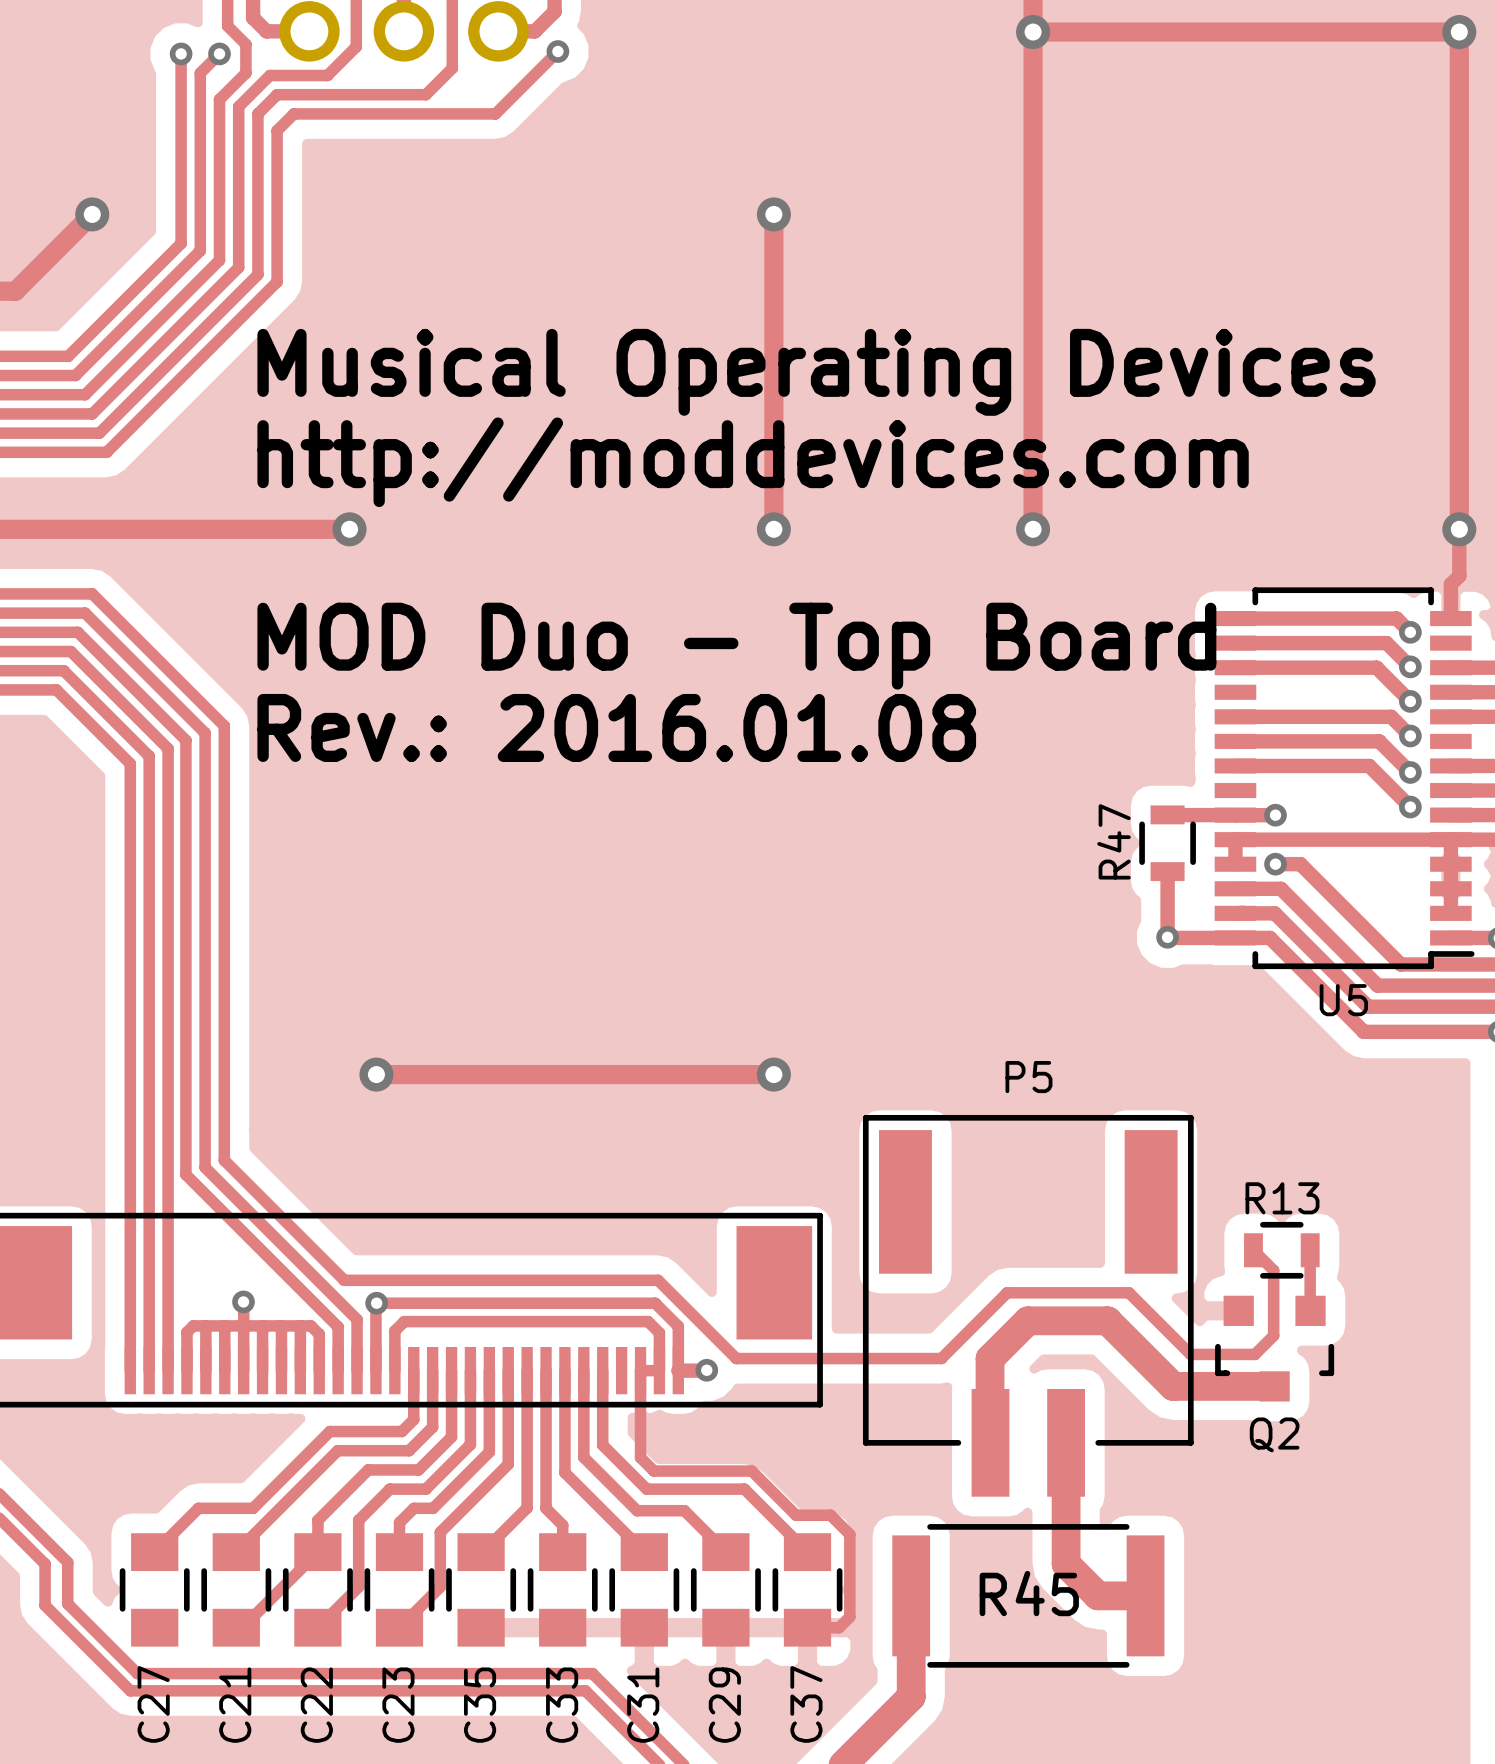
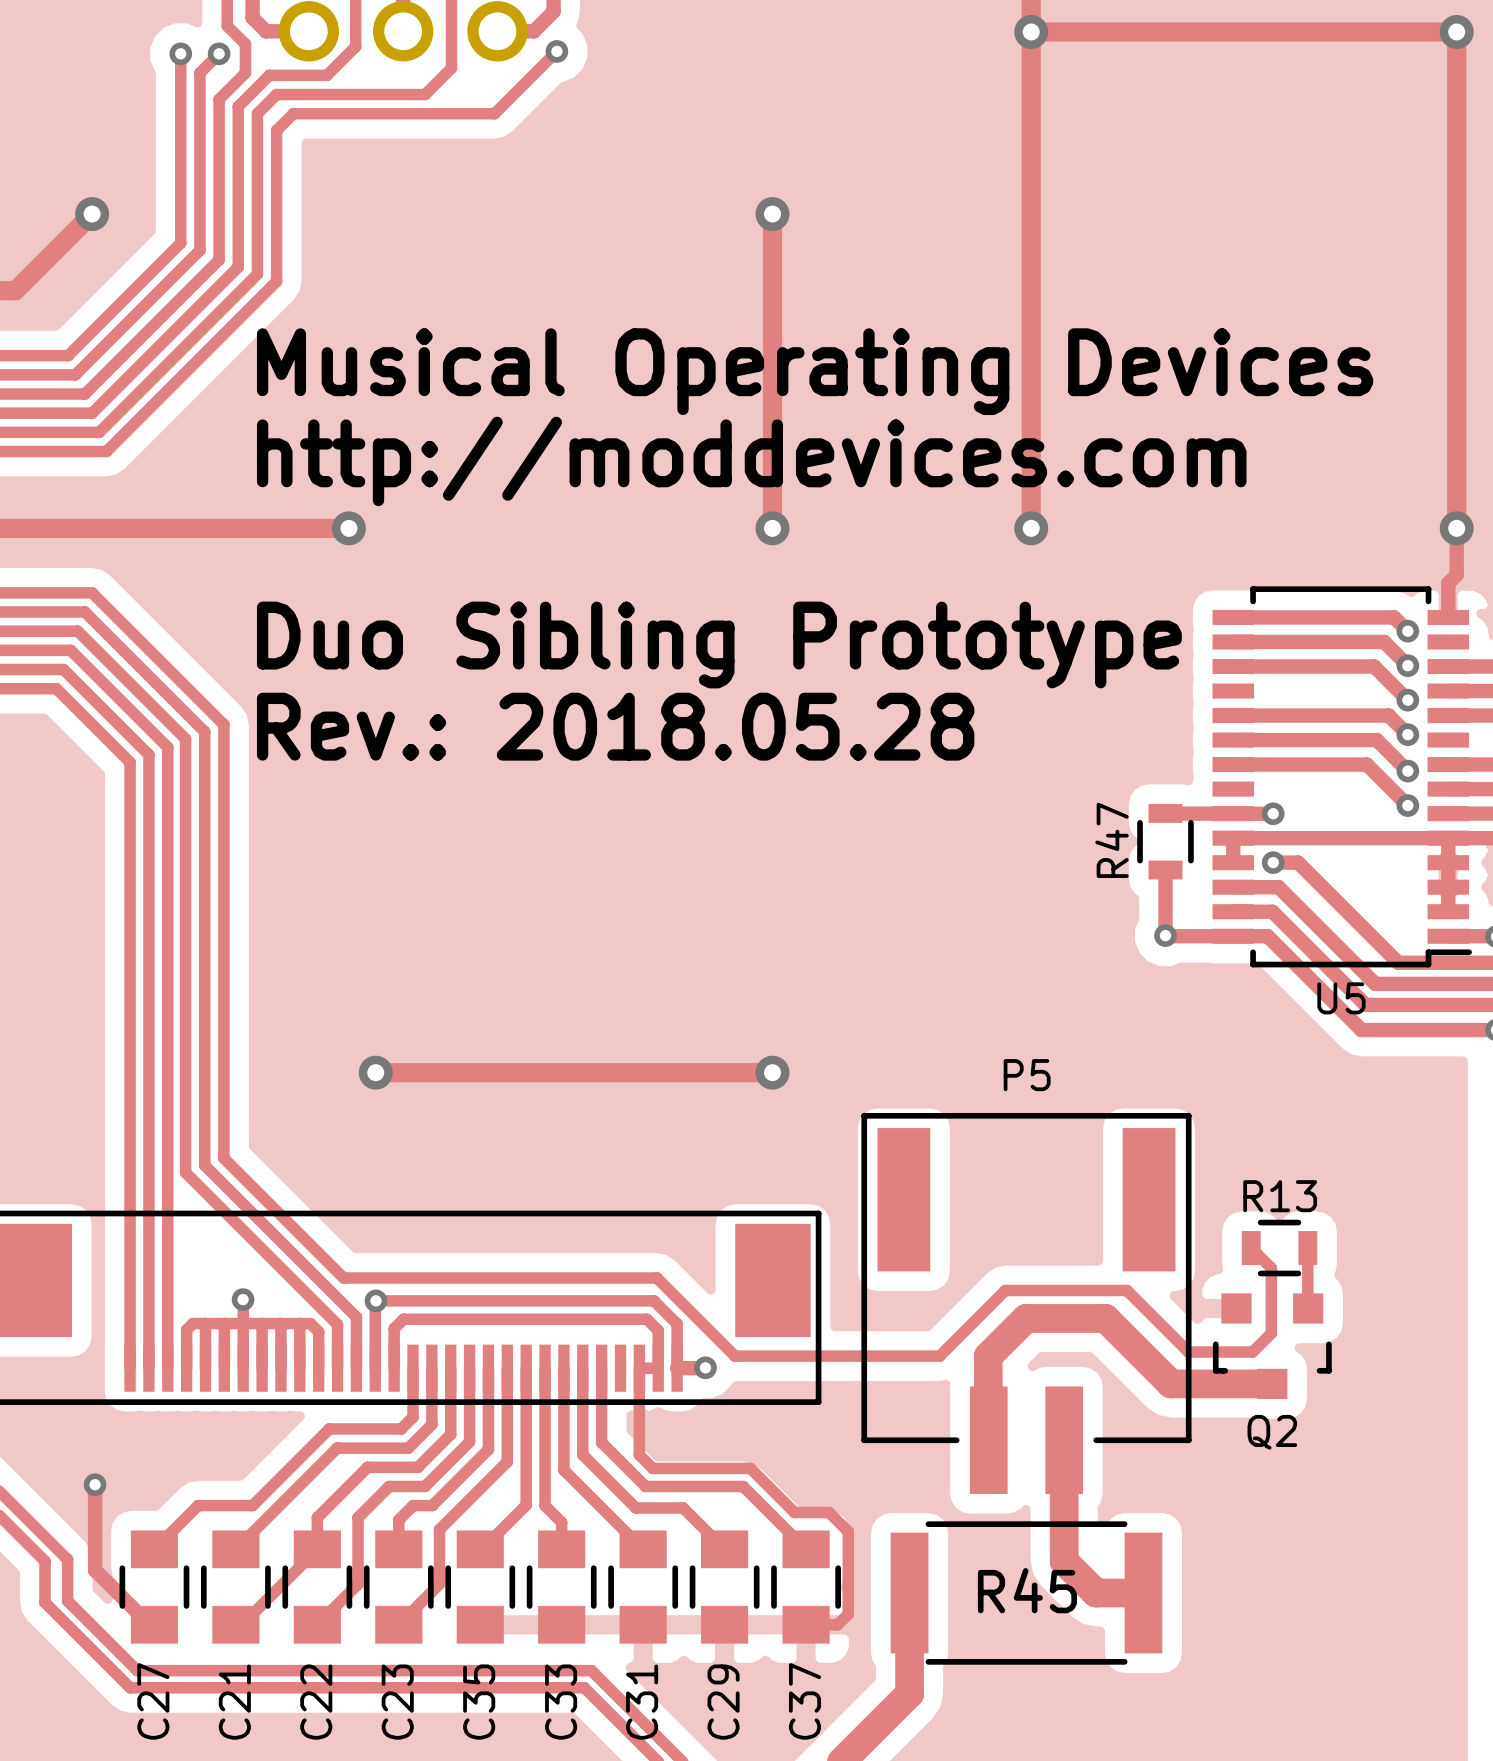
text: MOD Duo - Top Board (736, 646) -> Duo Sibling Prototype (719, 645)
text: Rev.: 2016.01.08 (616, 727) -> Rev.: 2018.05.28 (615, 726)
track: none -> (95, 1484) (95, 1570) (149, 1624) (154, 1624)
via: none -> (95, 1484)

